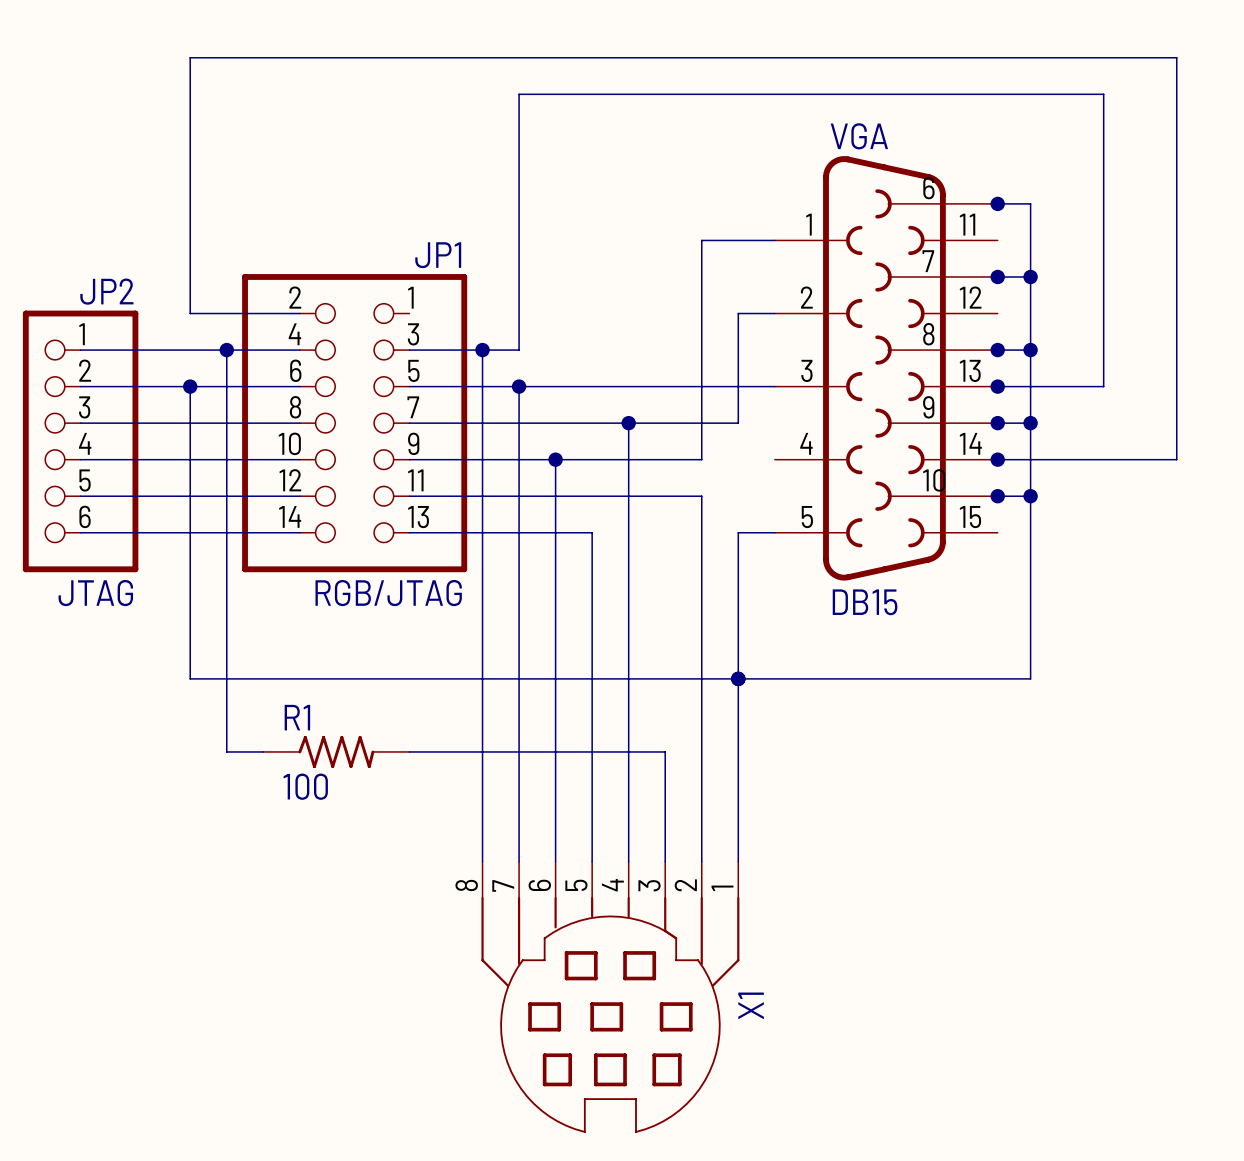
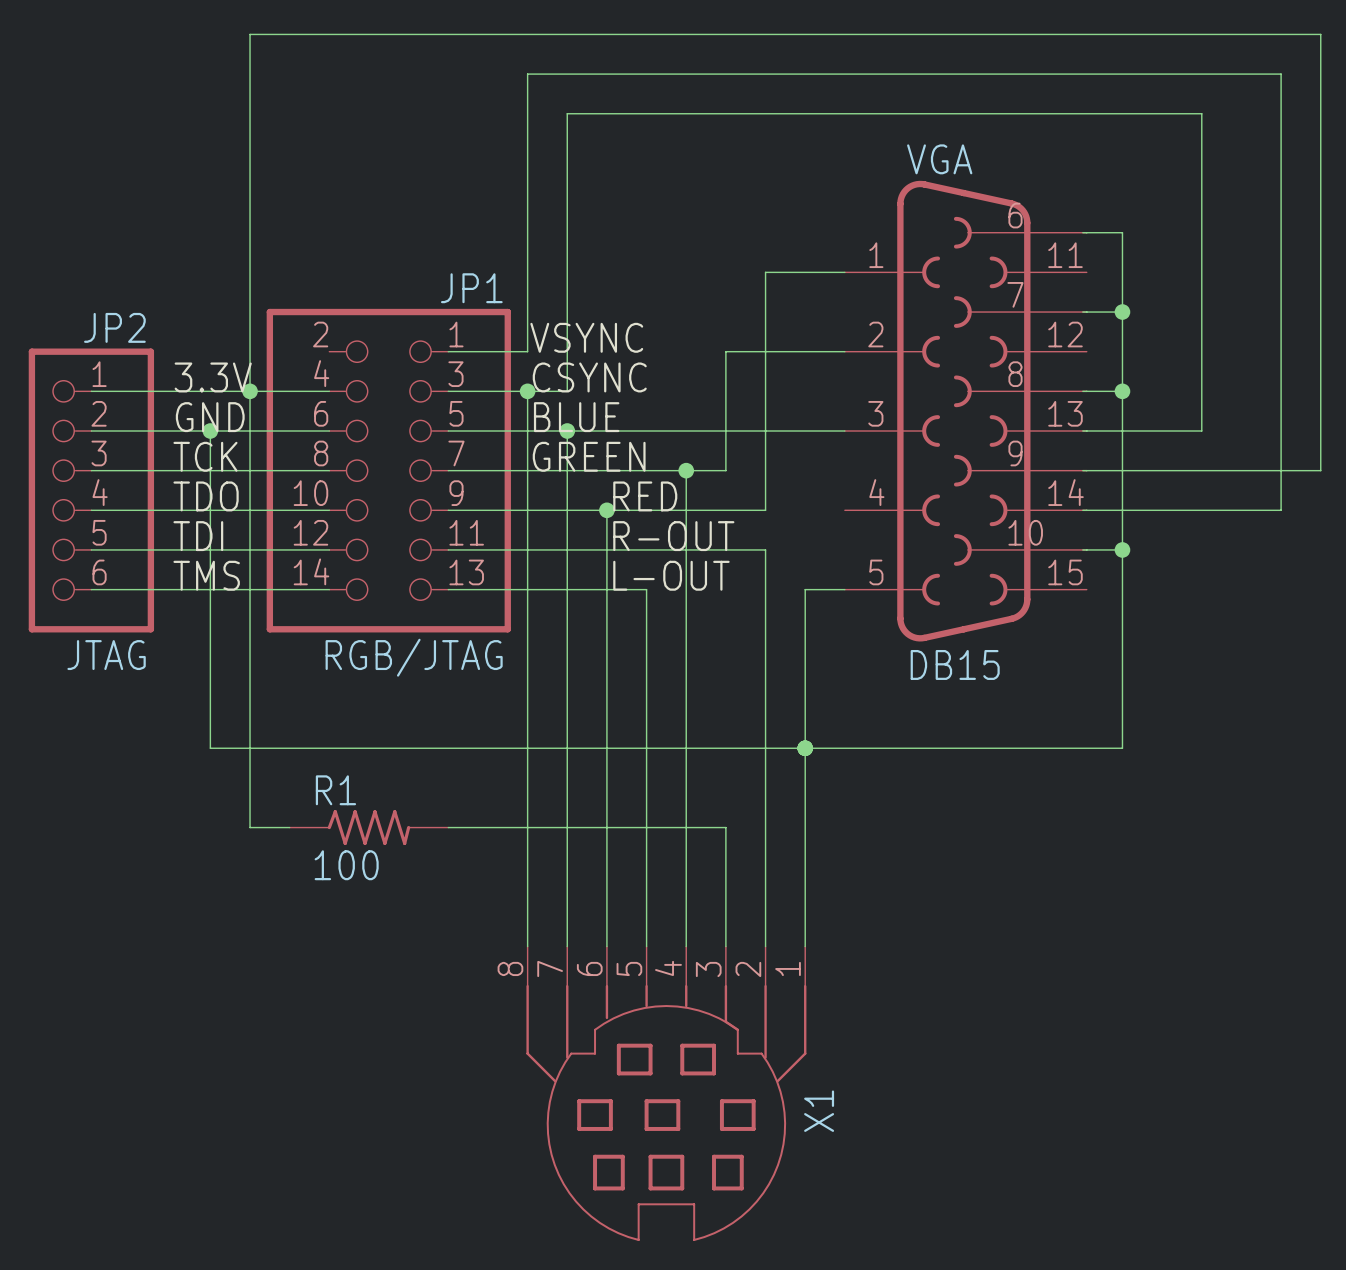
wire: (482, 57) (190, 57) (190, 313) (299, 313) -> (527, 74) (527, 351) (448, 351)
junction: (997, 203) -> none
junction: (997, 276) -> none
label: none -> VSYNC (586, 337)
wire: (738, 313) (738, 423) (665, 423) -> (805, 351) (725, 351) (725, 470)
label: none -> 3.3V (213, 377)
label: none -> CSYNC (589, 377)
wire: none -> (250, 391) (250, 34) (1320, 34) (1320, 470) (1122, 470)
junction: (997, 350) -> none
label: none -> GND (210, 417)
label: none -> BLUE (576, 417)
junction: (997, 386) -> none
label: none -> TCK (205, 456)
label: none -> GREEN (589, 456)
junction: (997, 423) -> none
junction: (1030, 423) -> none
label: none -> TDO (206, 496)
label: none -> RED (645, 496)
junction: (997, 459) -> none
label: none -> TDI (198, 536)
label: none -> R-OUT (673, 536)
junction: (997, 496) -> none
label: none -> TMS (206, 575)
label: none -> L-OUT (671, 575)

